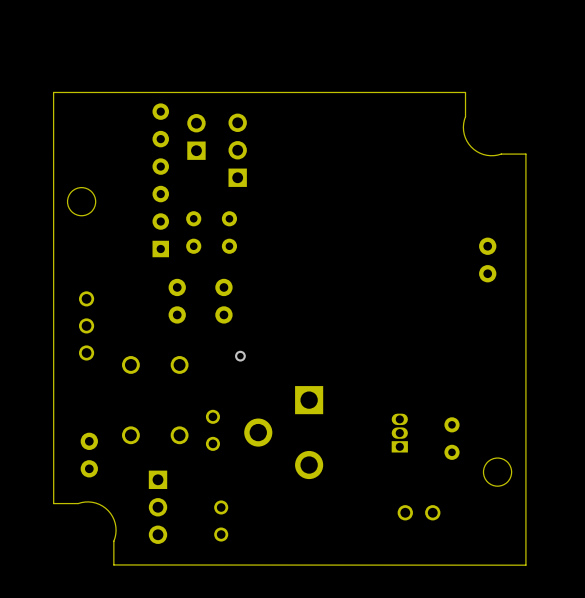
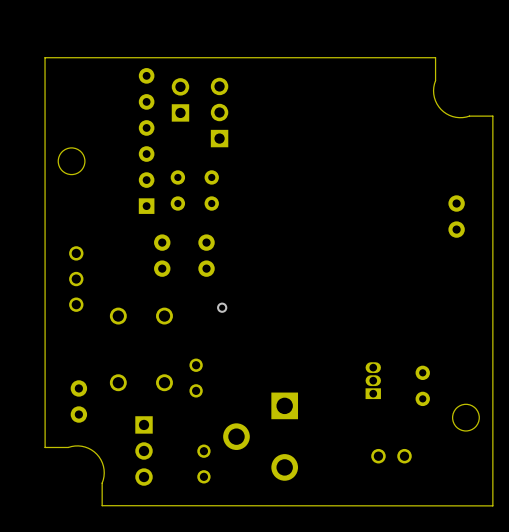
part position: (283, 432) -> (260, 436)

